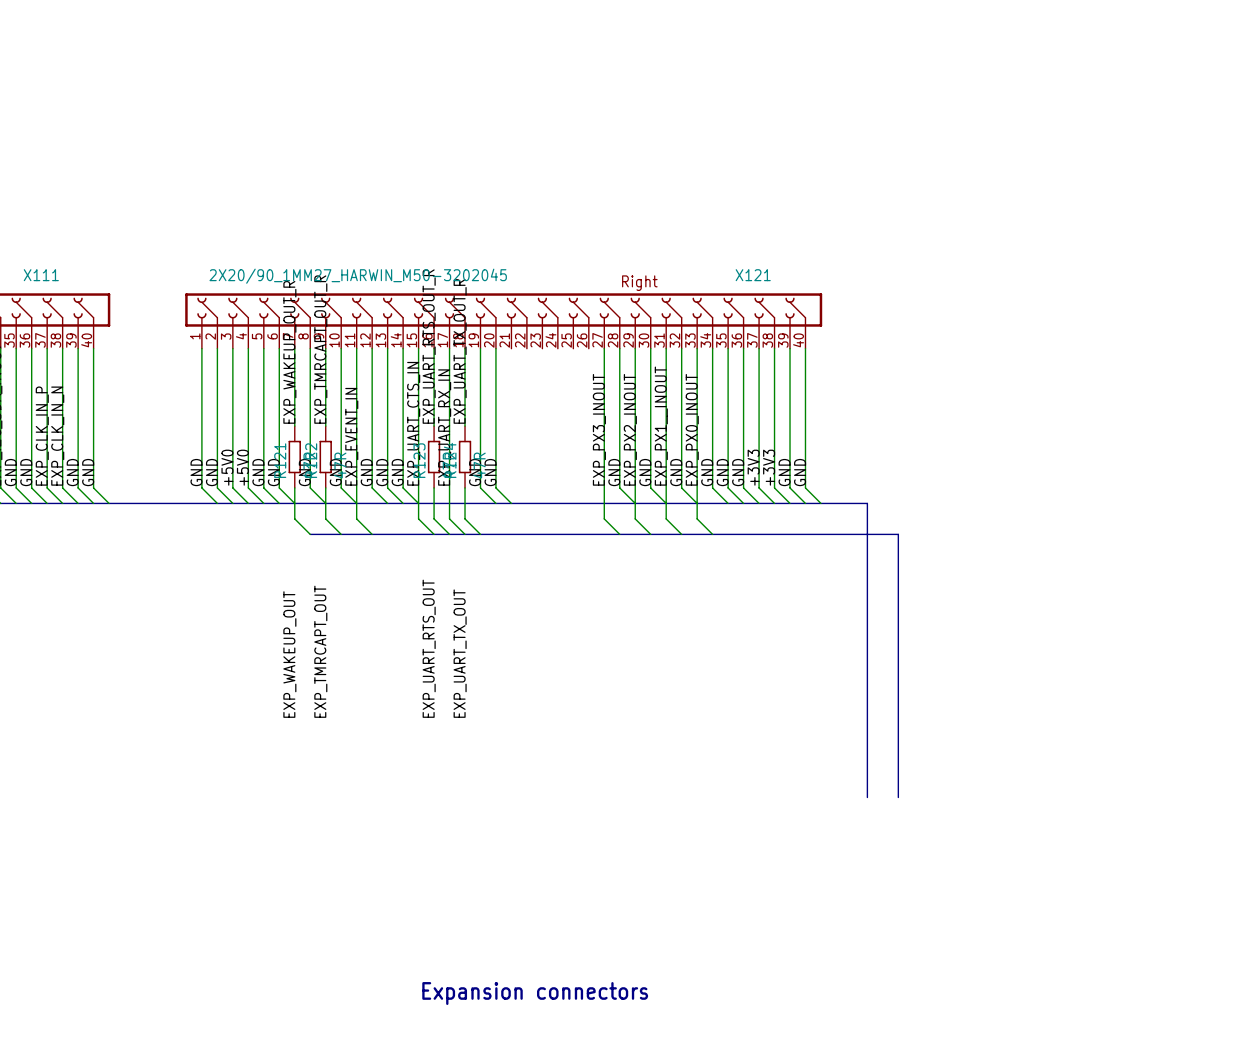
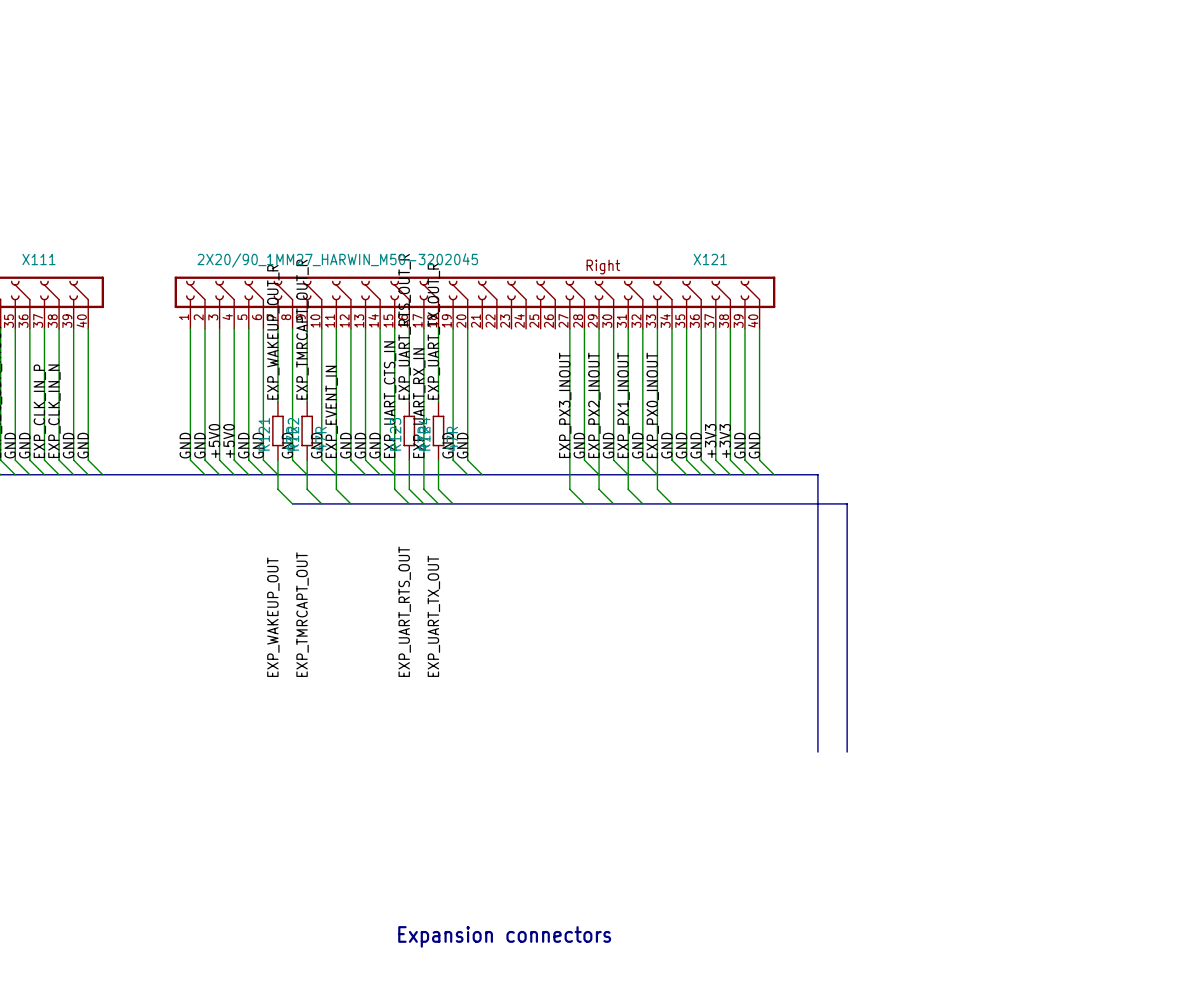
label: EXP_PX1__INOUT (661, 426) -> EXP_PX1_INOUT (623, 405)

